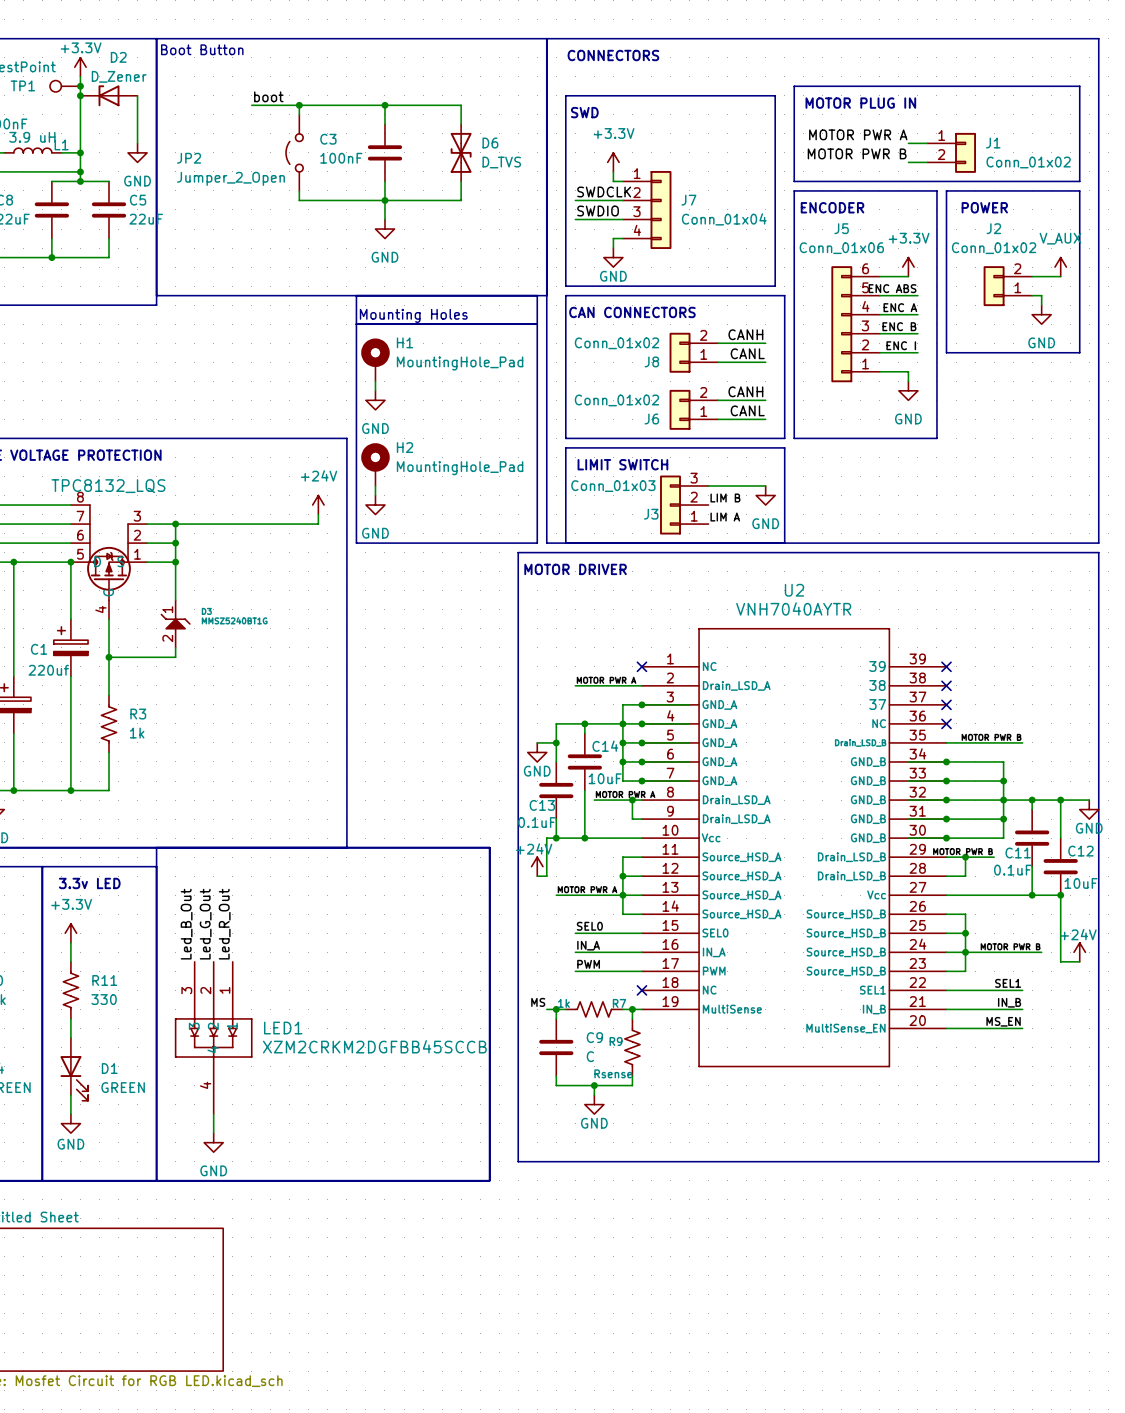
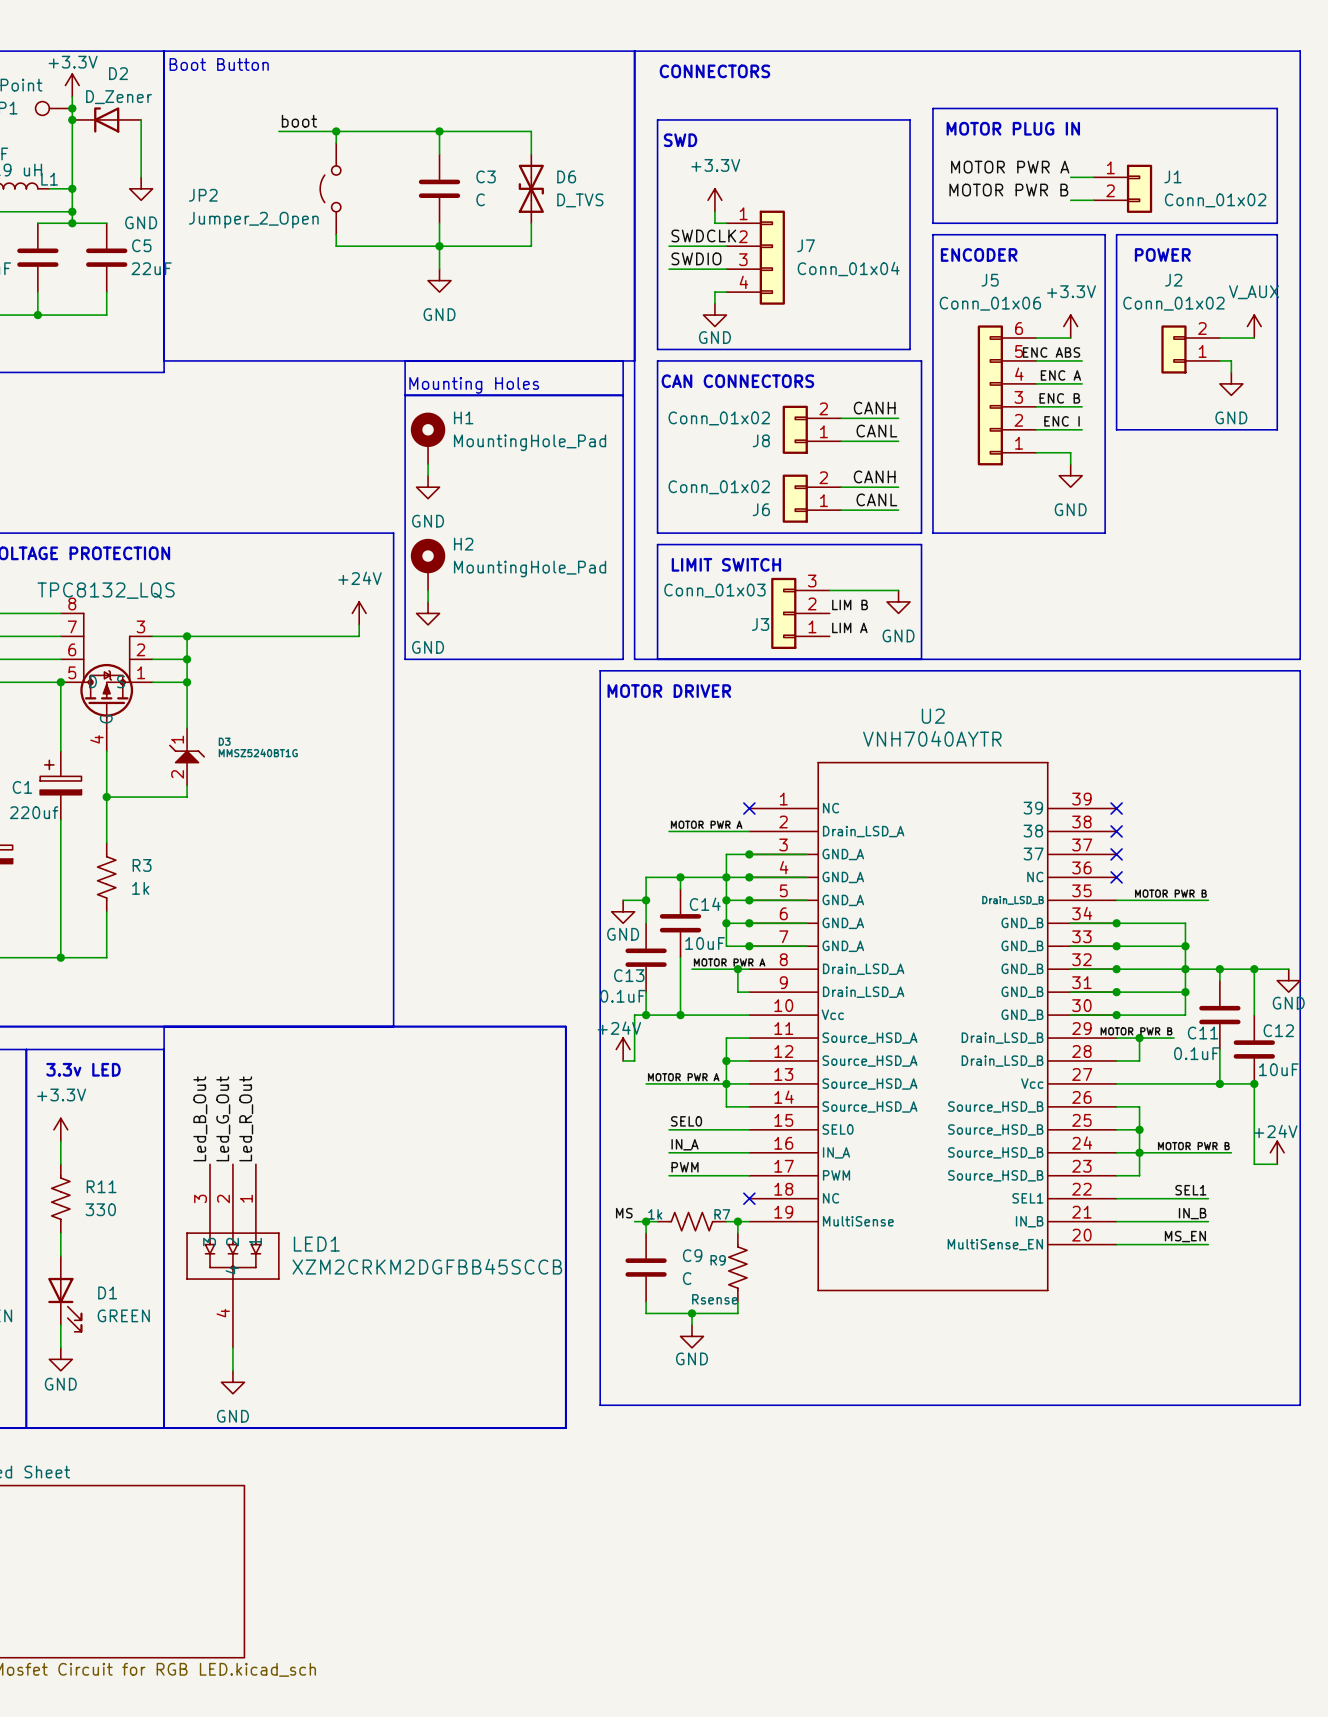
C3 name position: C3 (328, 139) -> C3 (486, 176)
C3 value: 100nF (341, 158) -> C (480, 199)

